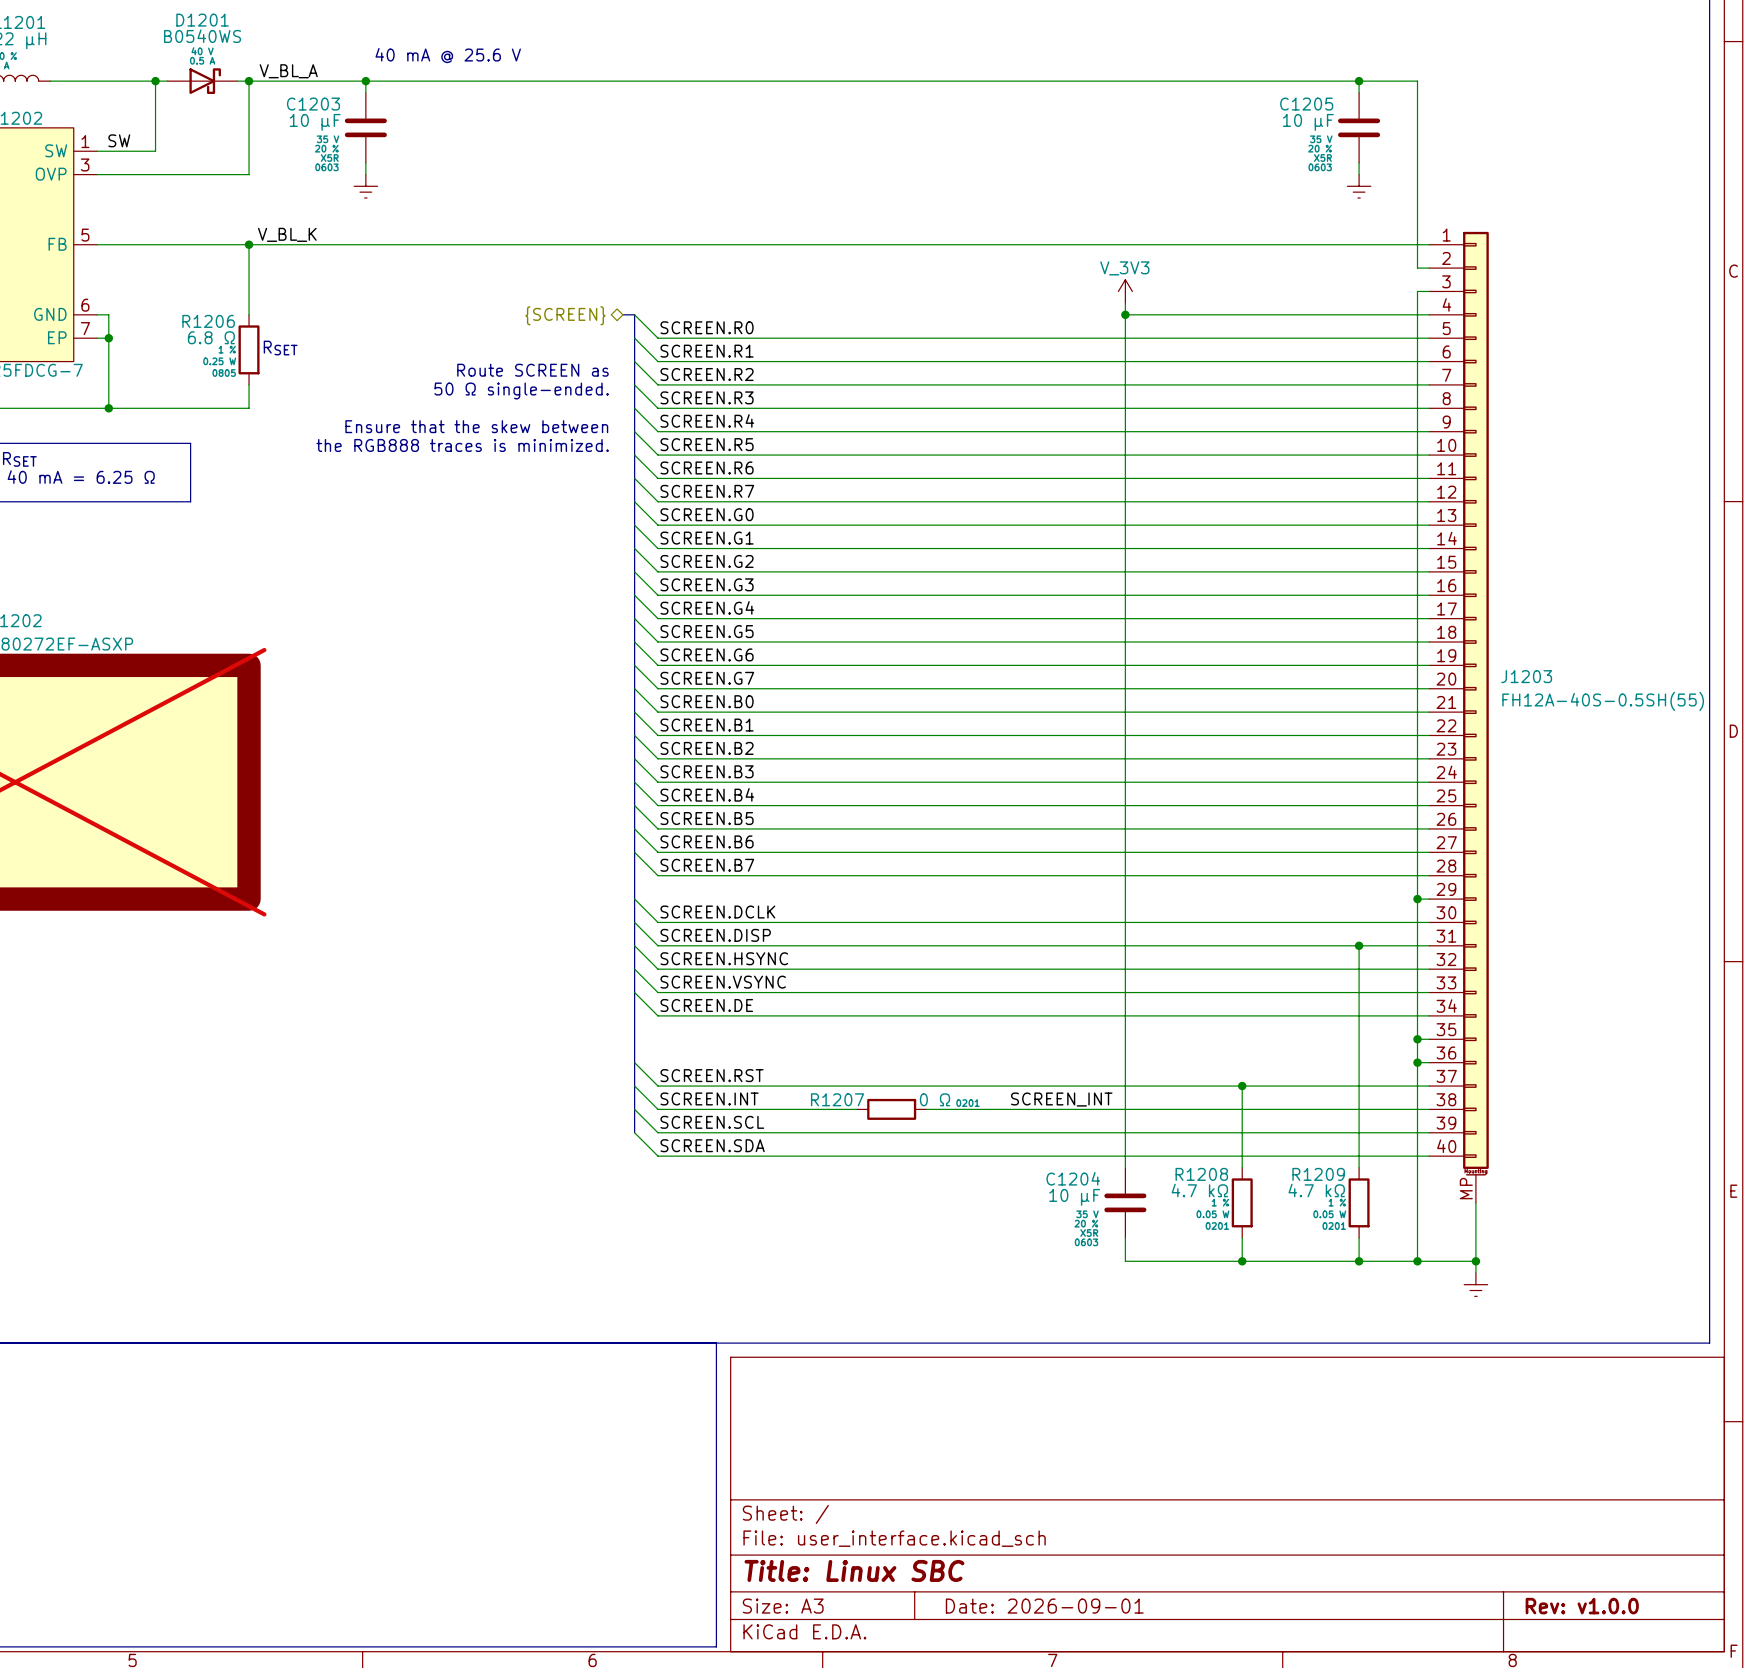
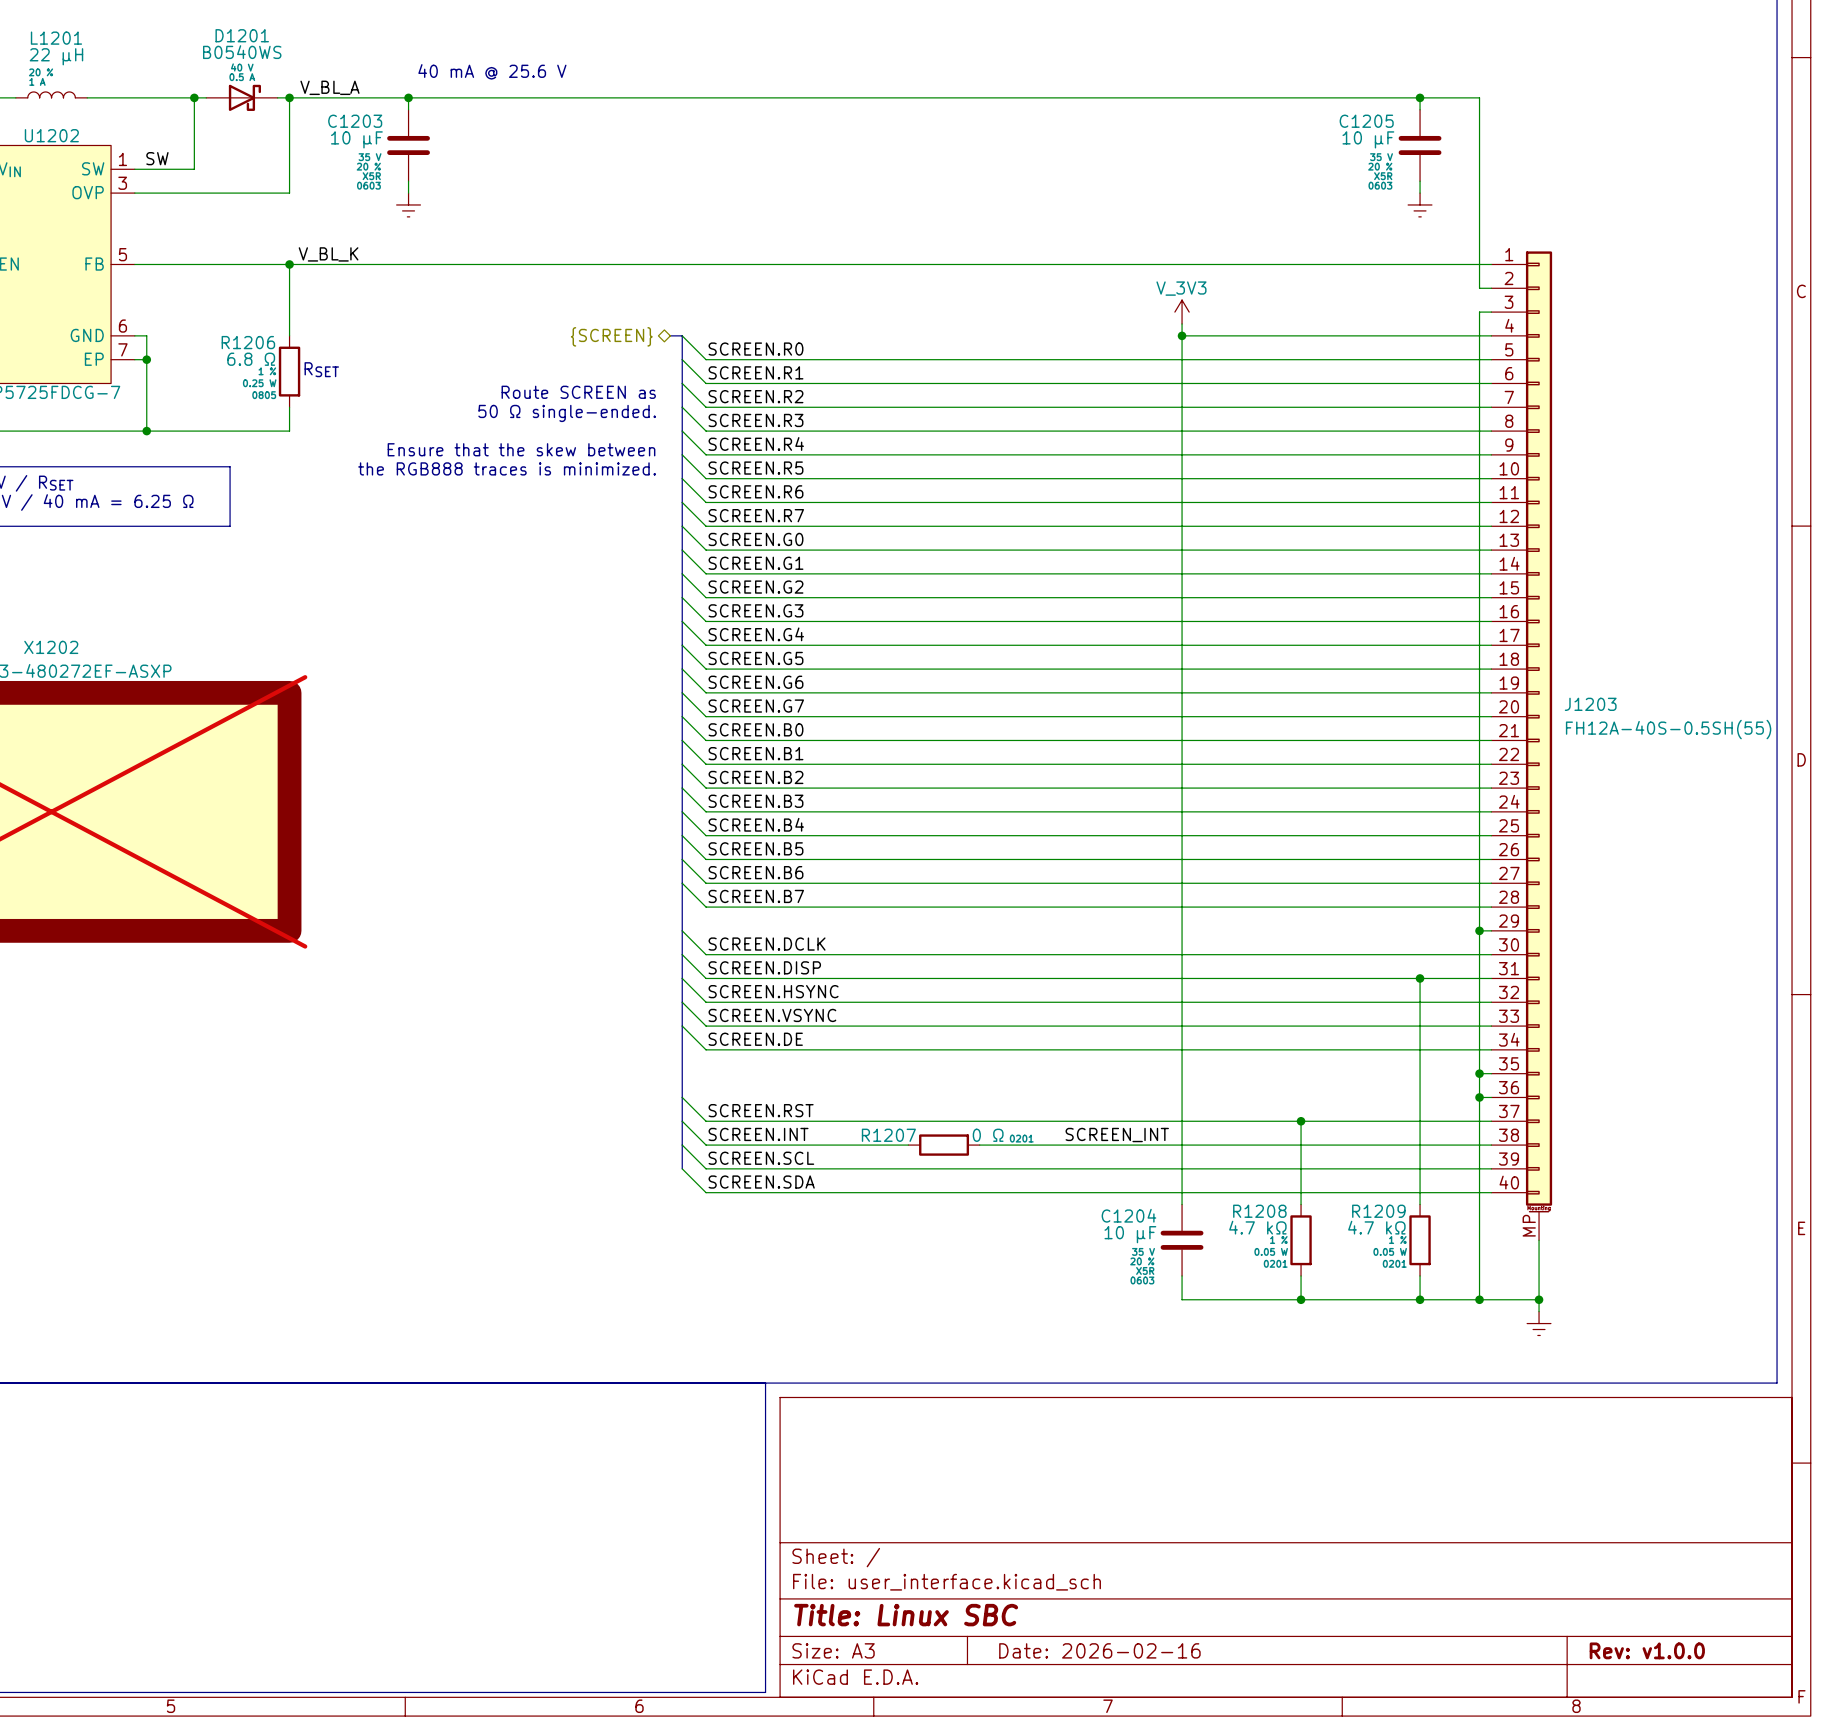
title block: Date: 2026-09-01 (1044, 1606) -> Date: 2026-02-16 (1099, 1650)

